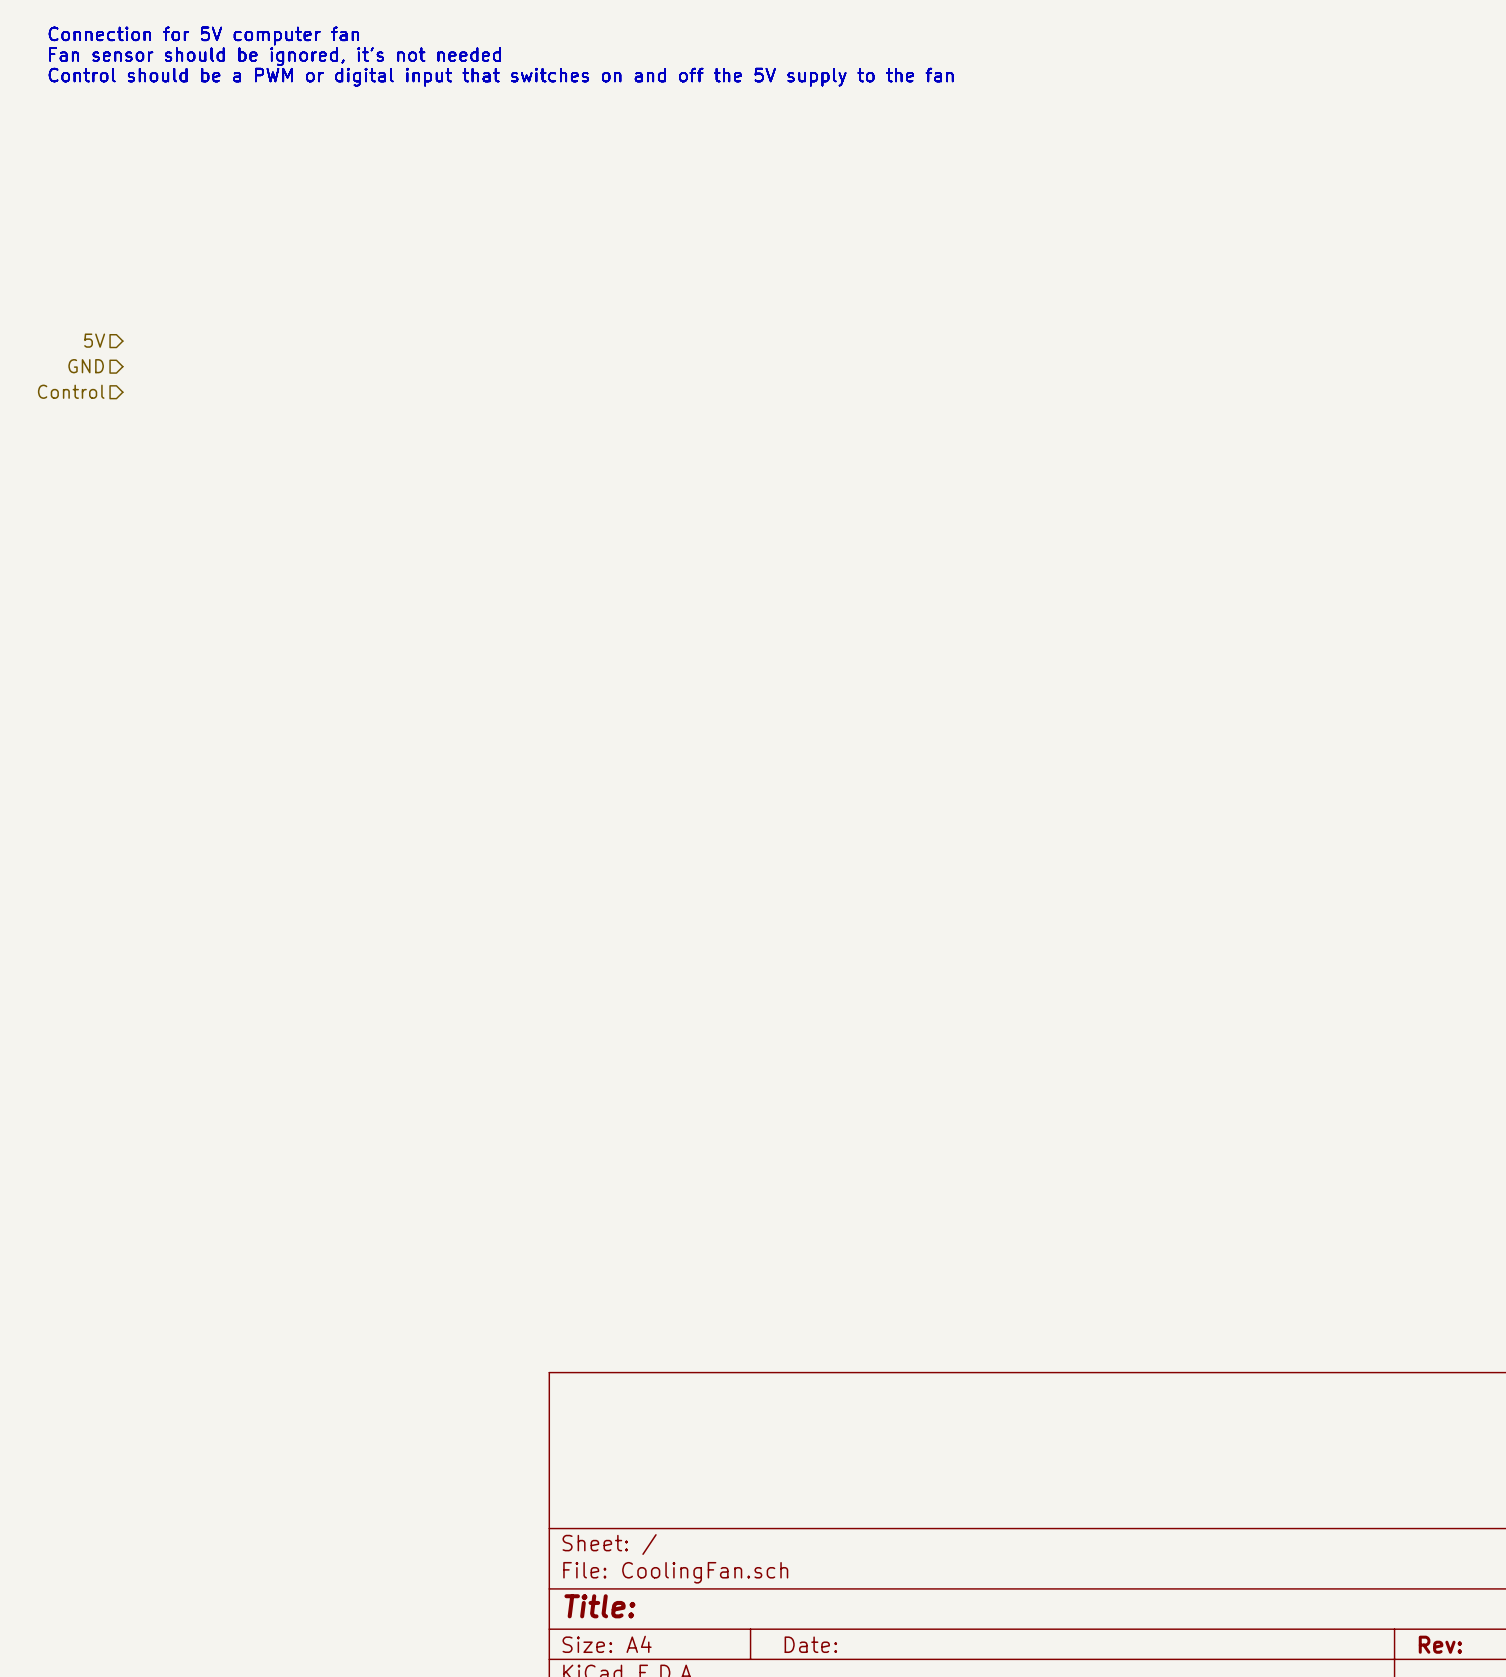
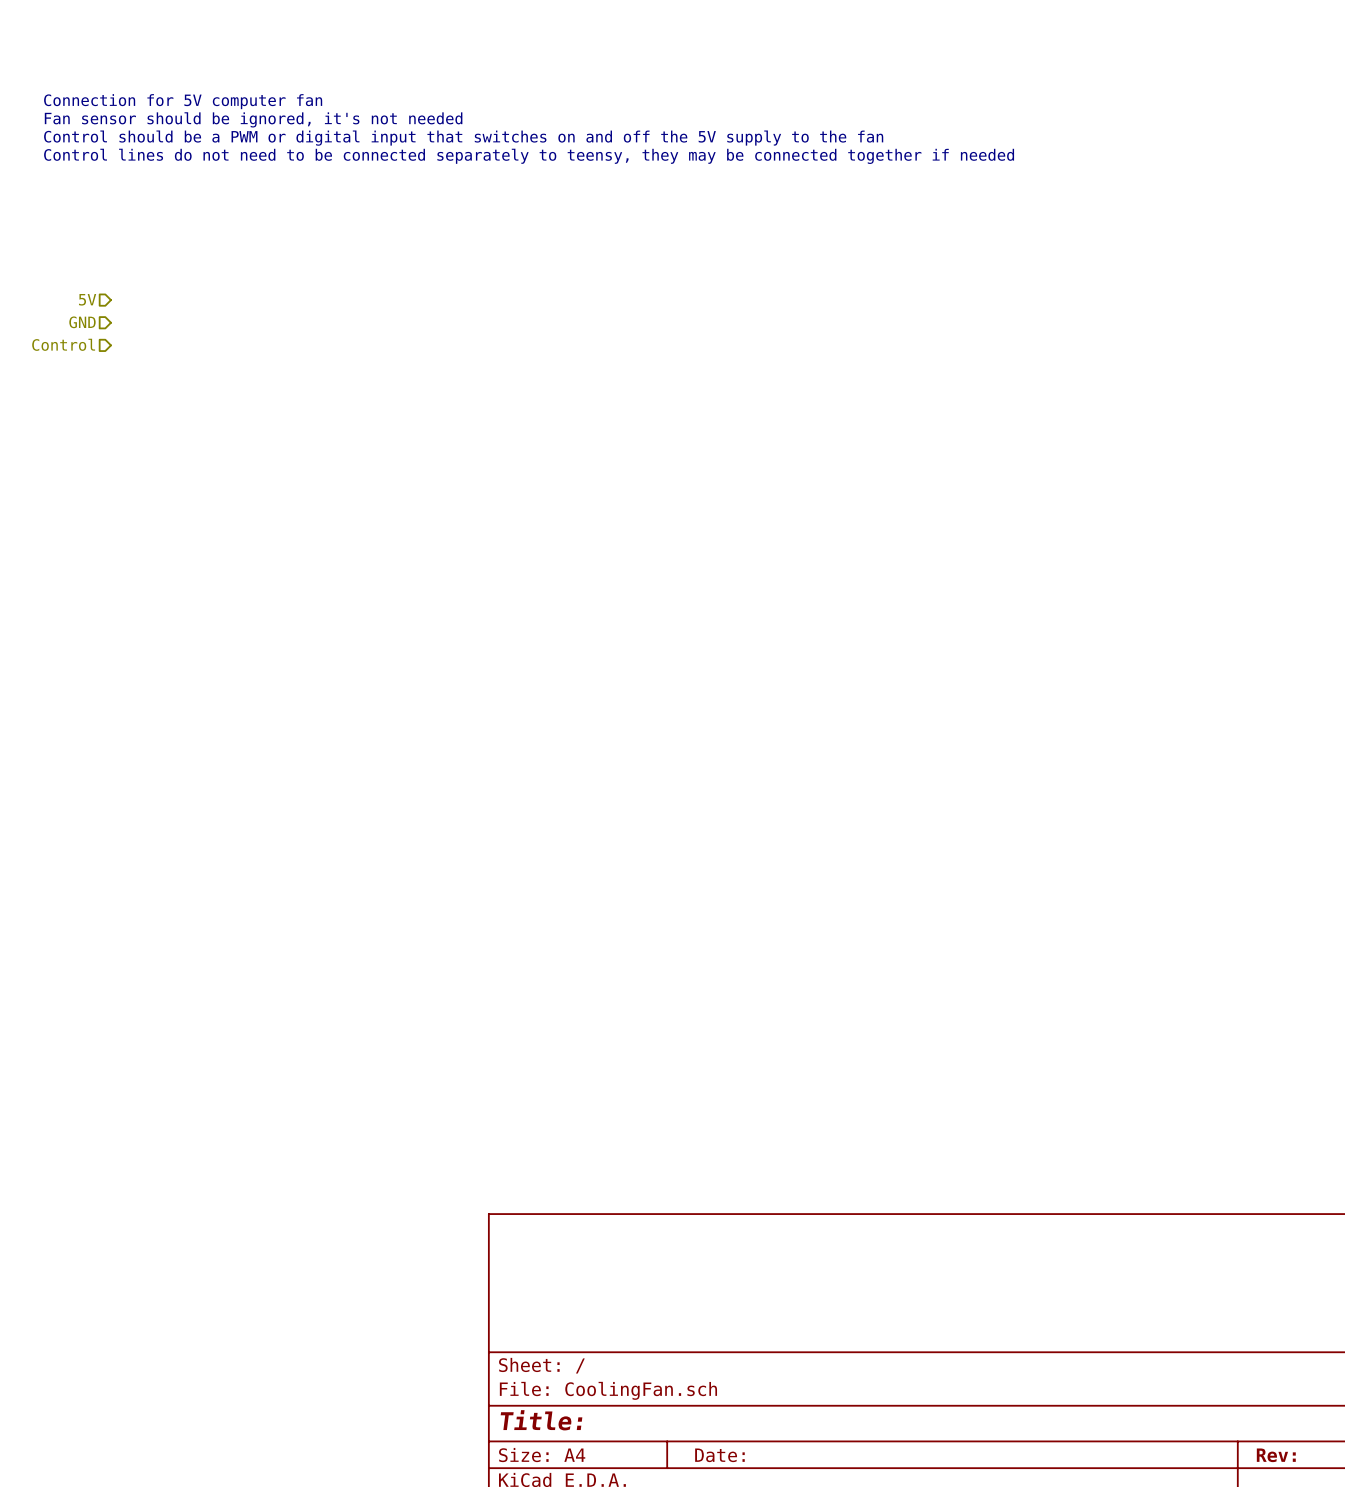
text position: Connection for 5V computer fan (203, 36) -> Connection for 5V computer fan (183, 101)
text position: Fan sensor should be ignored, it's not needed (275, 56) -> Fan sensor should be ignored, it's not needed (253, 119)
text position: Control should be a PWM or digital input that switches on and off the 5V supply to the fan (501, 77) -> Control should be a PWM or digital input that switches on and off the 5V supply to the fan (463, 138)
text: none -> Control lines do not need to be connected separately to teensy, they may be connected together if needed (529, 156)

